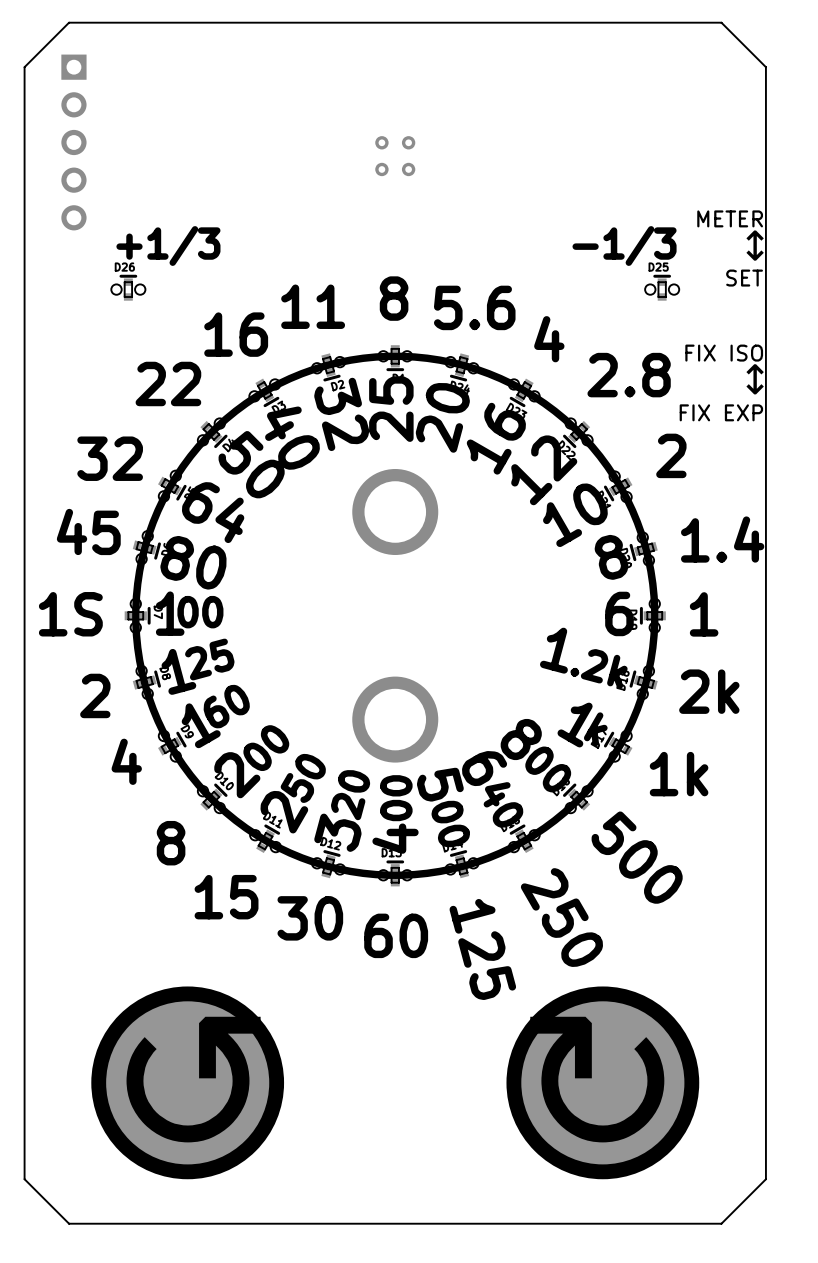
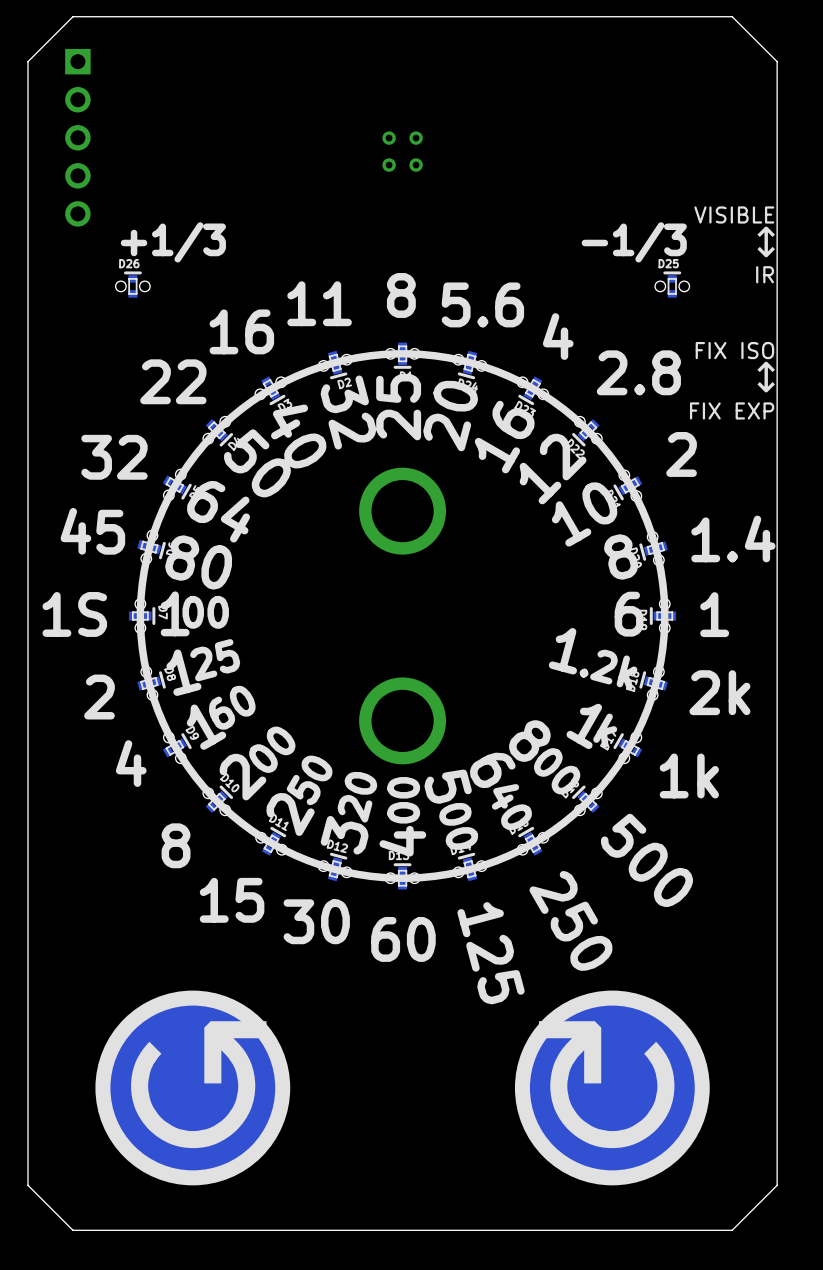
text: METER (730, 218) -> VISIBLE (734, 214)
text: SET (744, 278) -> IR (765, 274)

